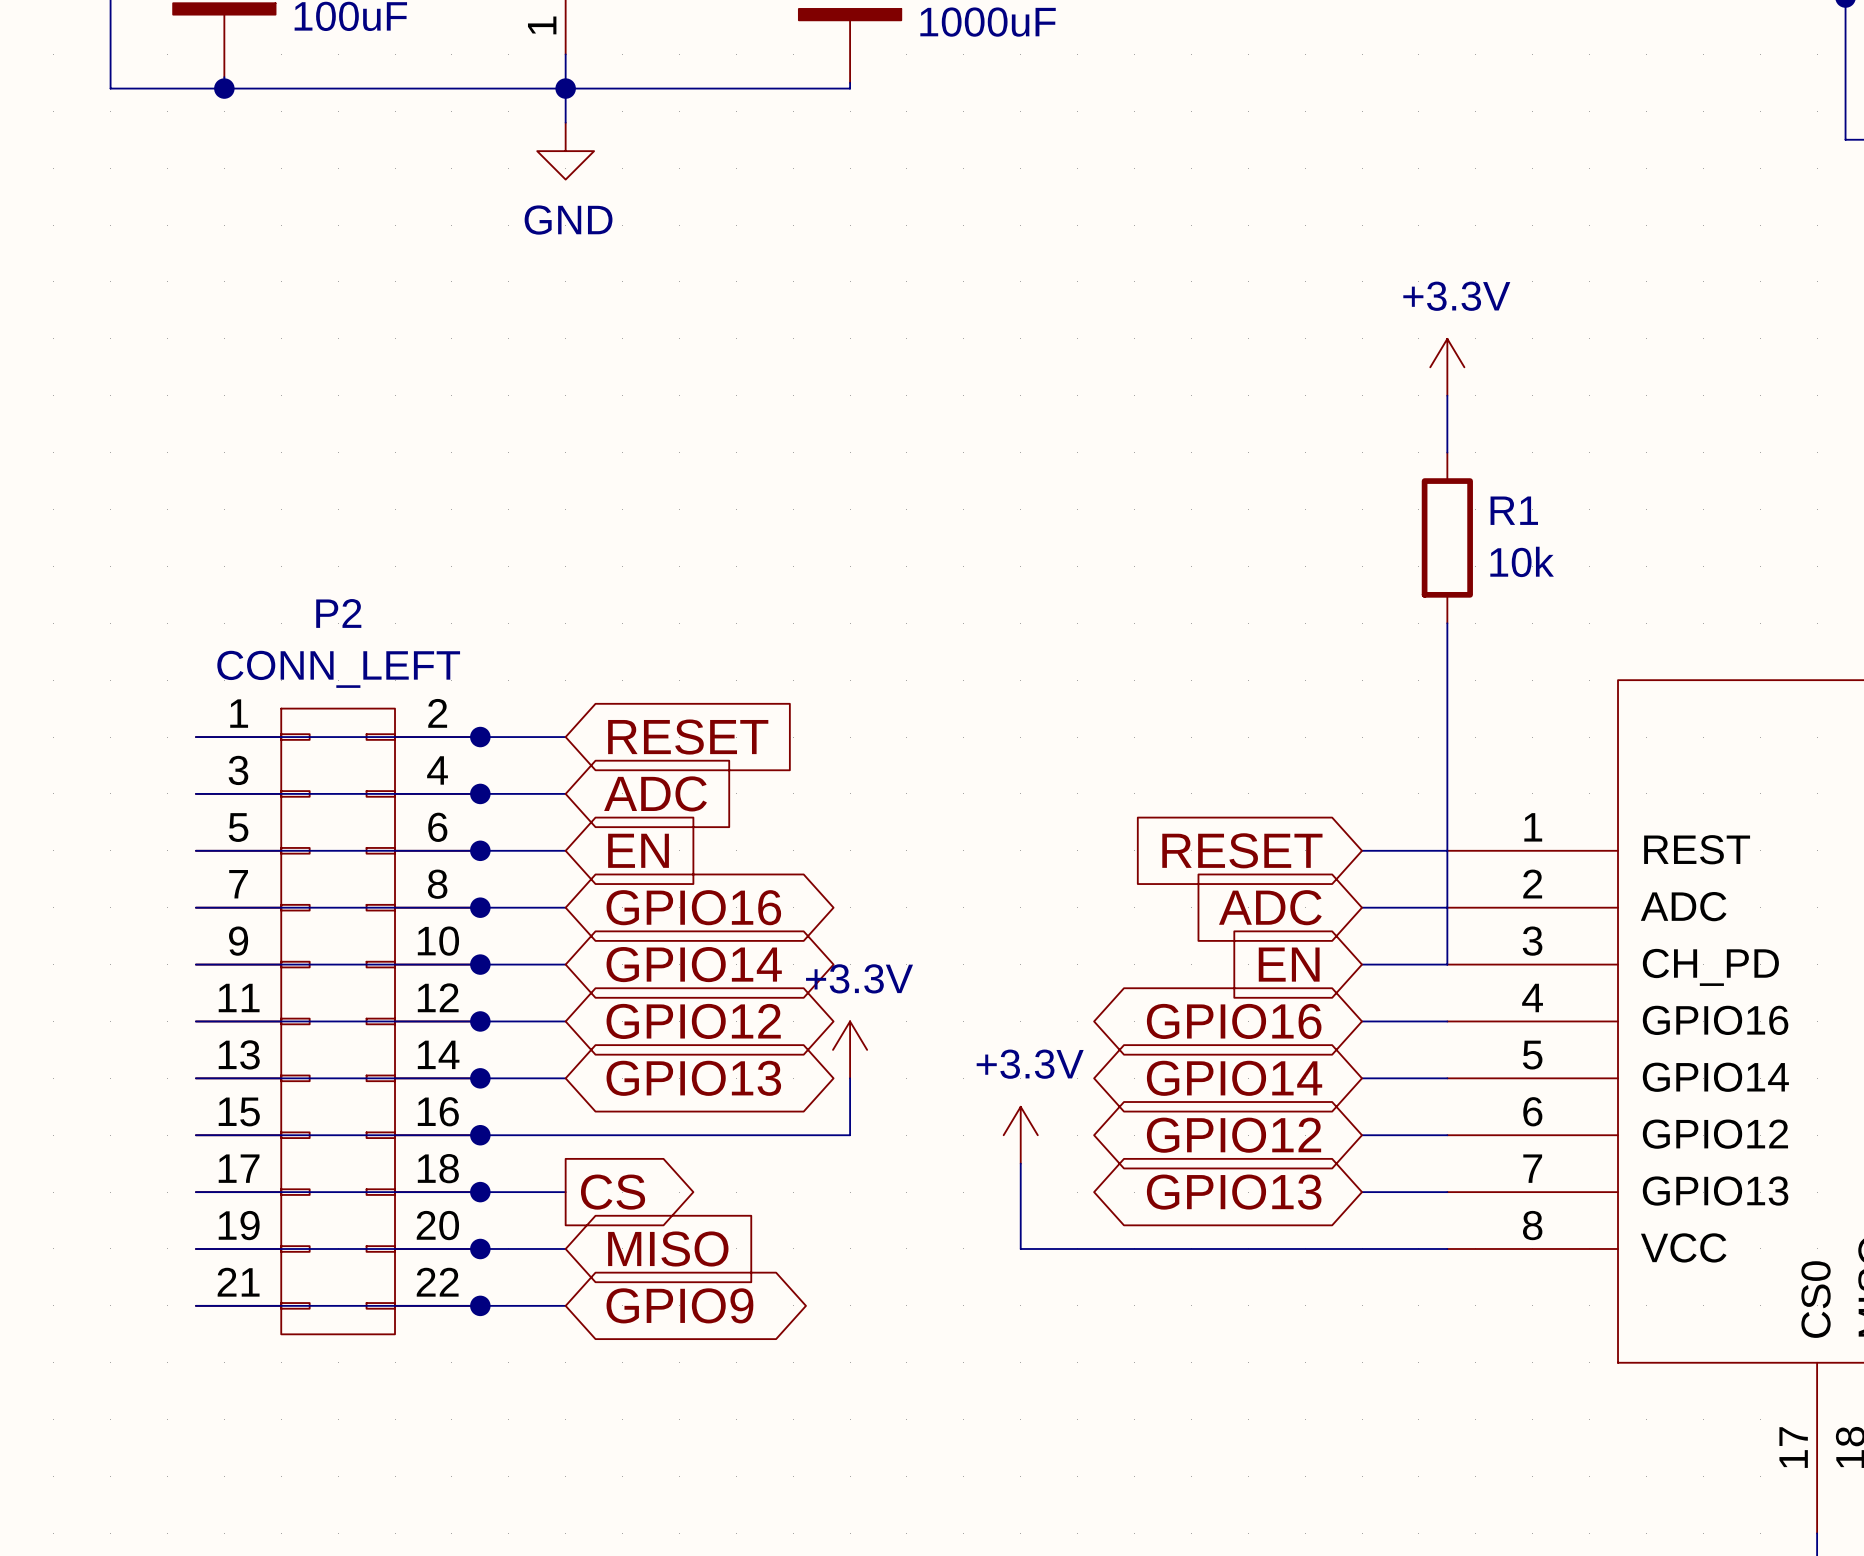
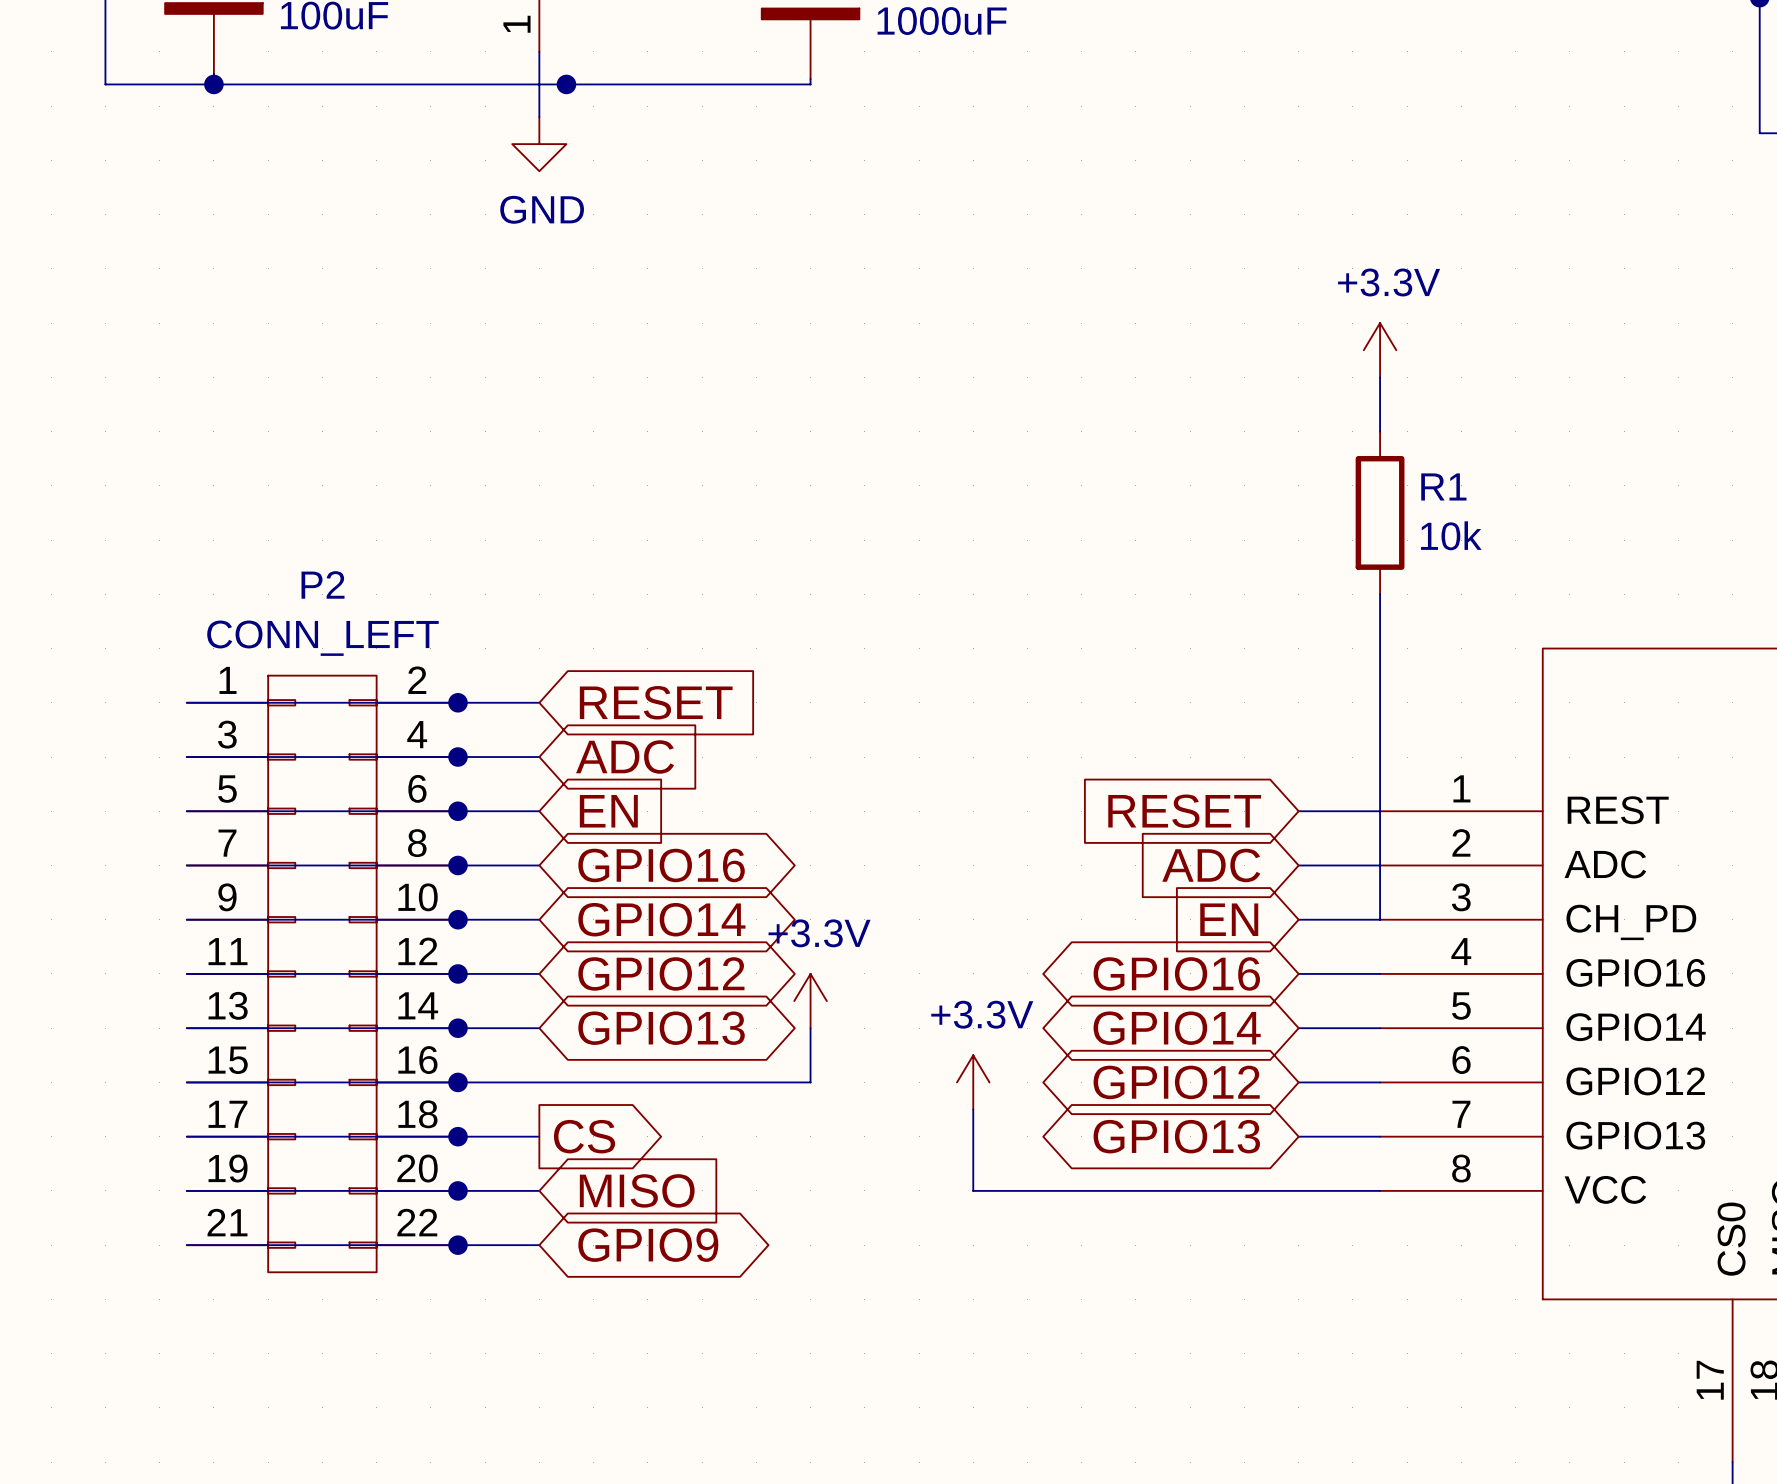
junction position: (565, 88) -> (566, 84)

